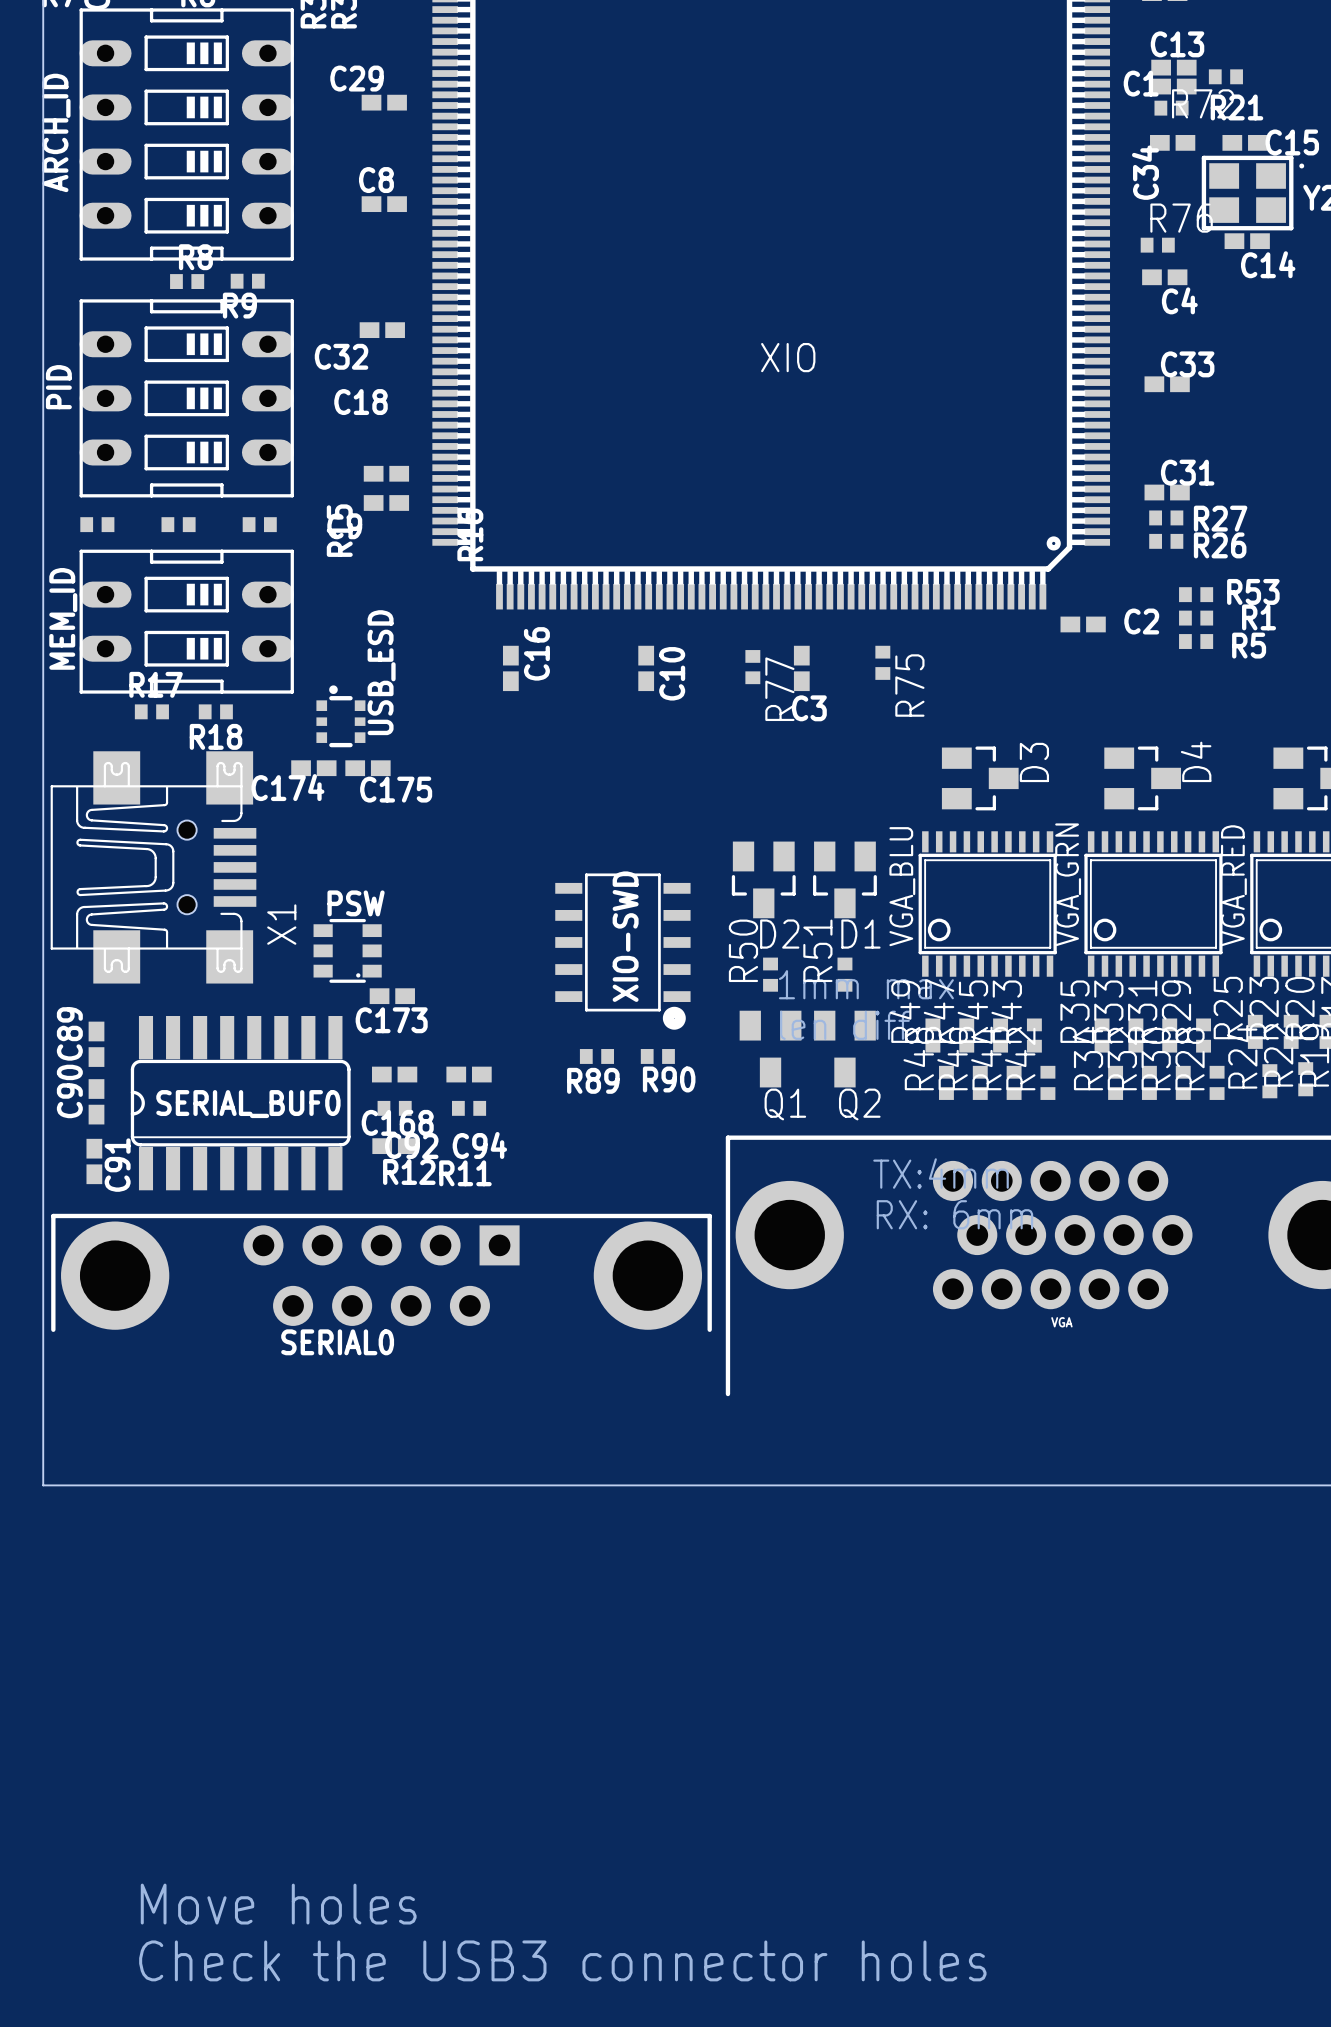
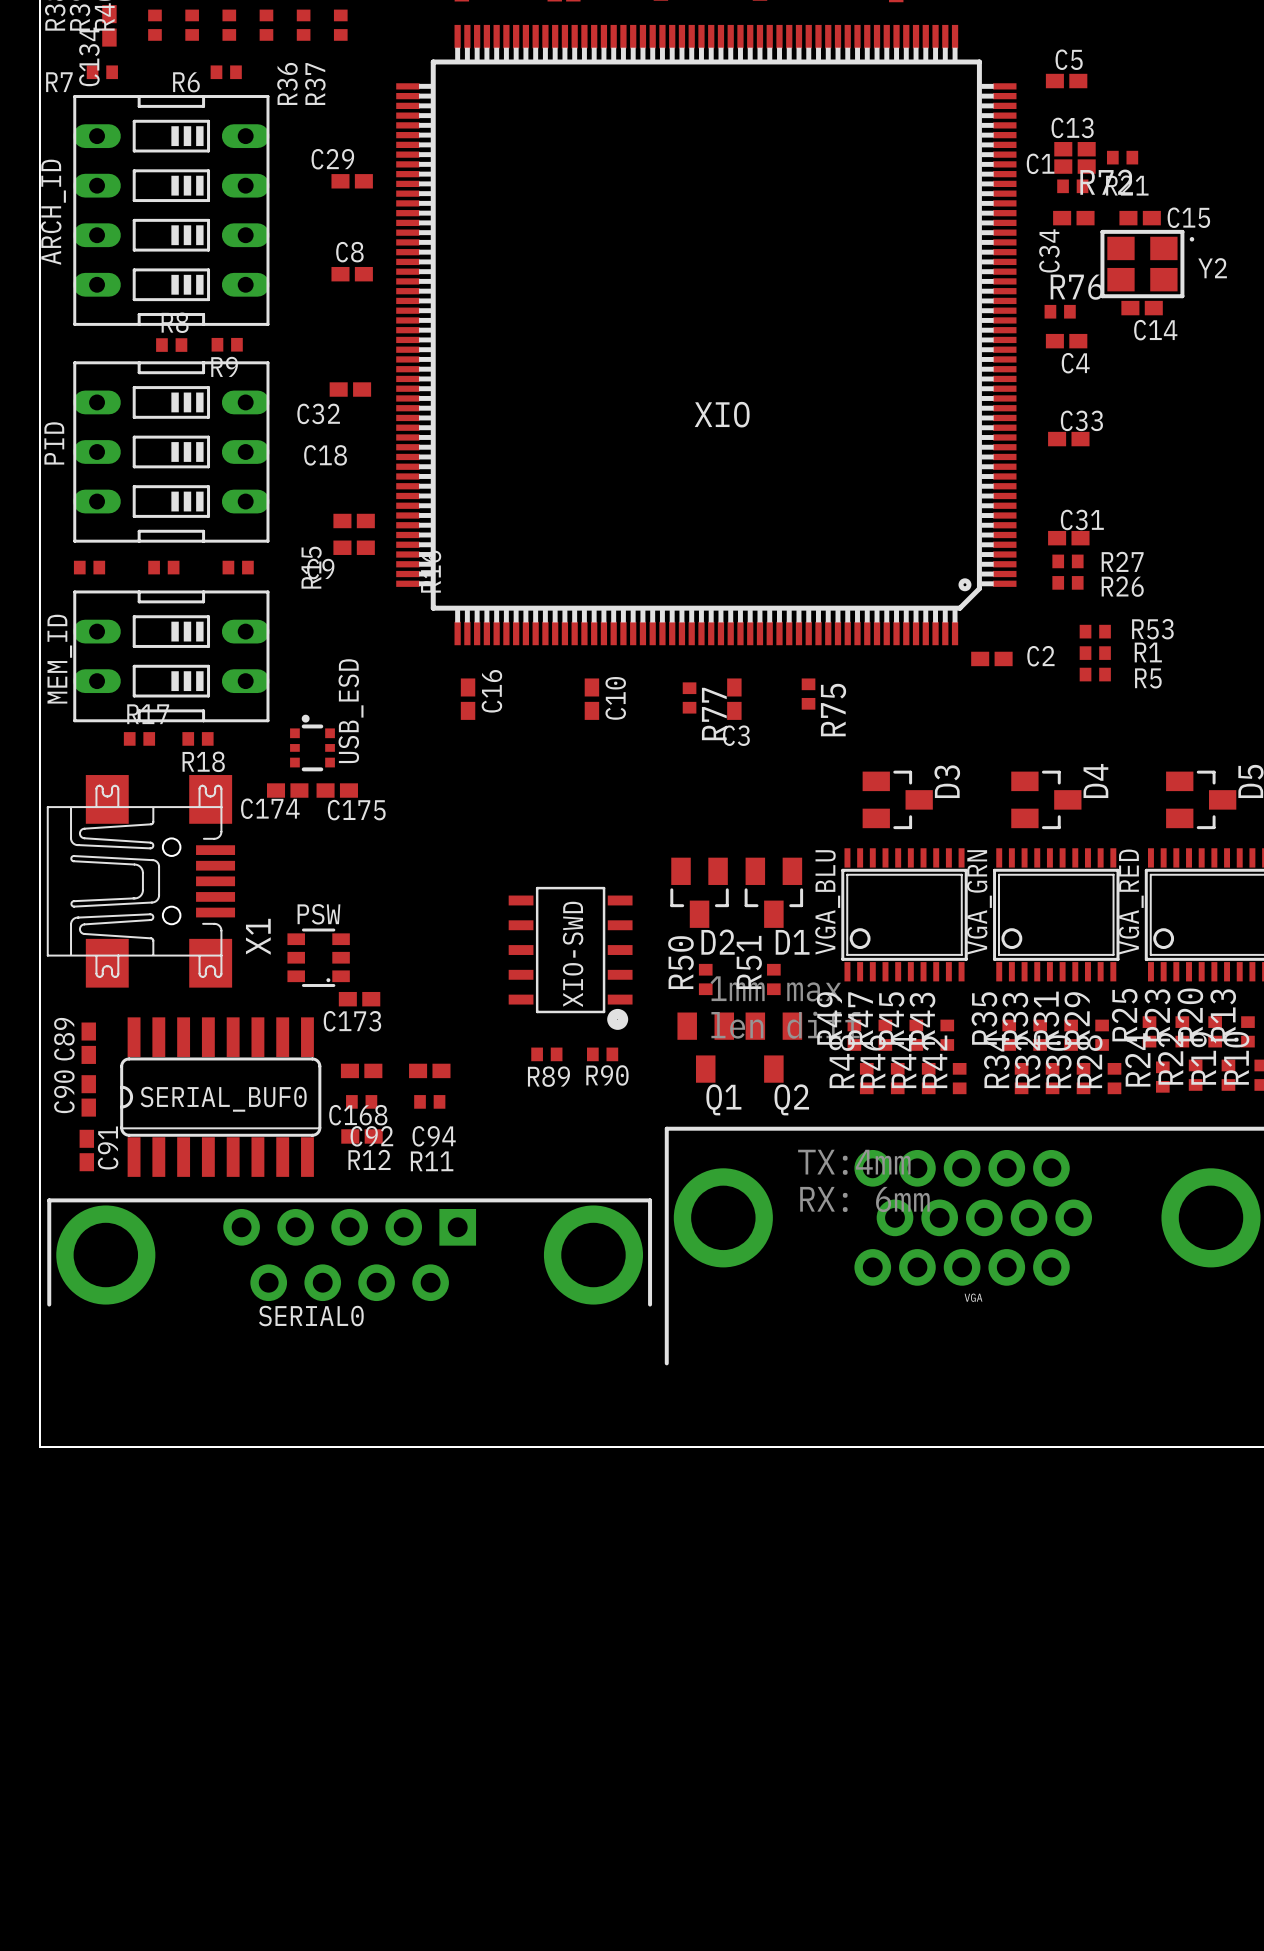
text: Move holes (278, 1904) -> none
text: Check the USB3 connector holes (562, 1960) -> none

